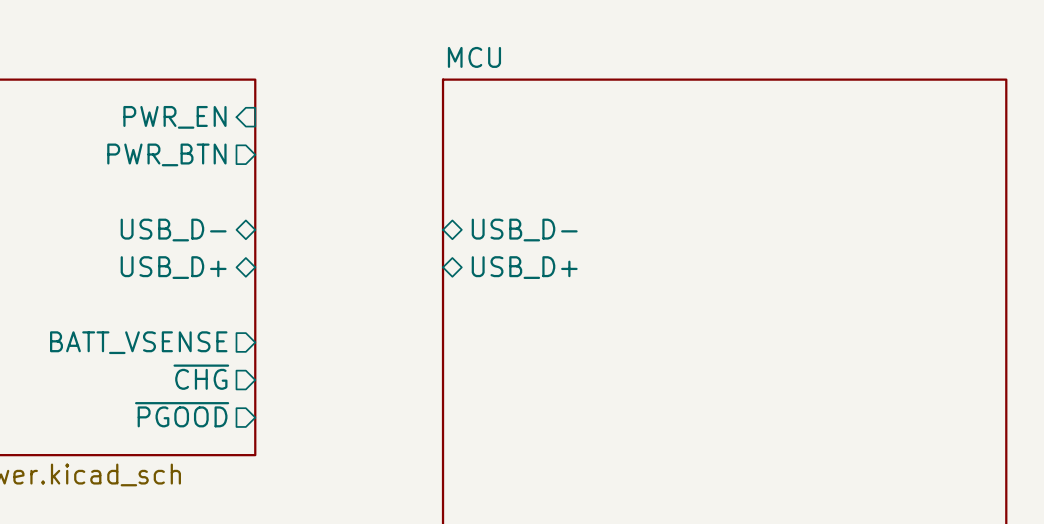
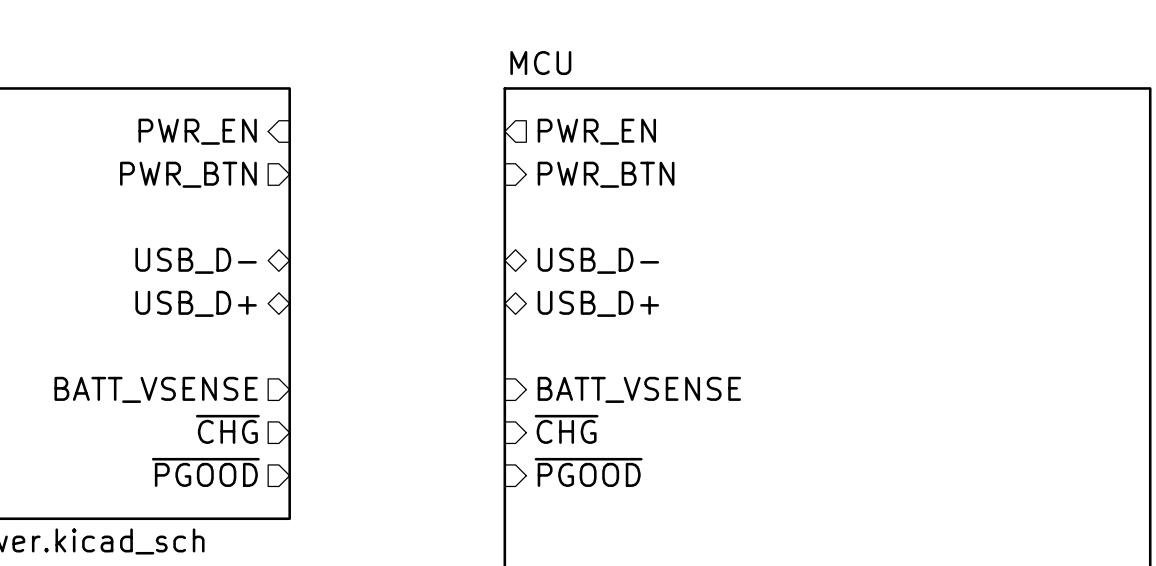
sheet pin: none -> PWR_EN (596, 131)
sheet pin: none -> PWR_BTN (606, 174)
sheet pin: none -> BATT_VSENSE (639, 389)
sheet pin: none -> ~{CHG} (566, 429)
sheet pin: none -> ~{PGOOD} (588, 472)

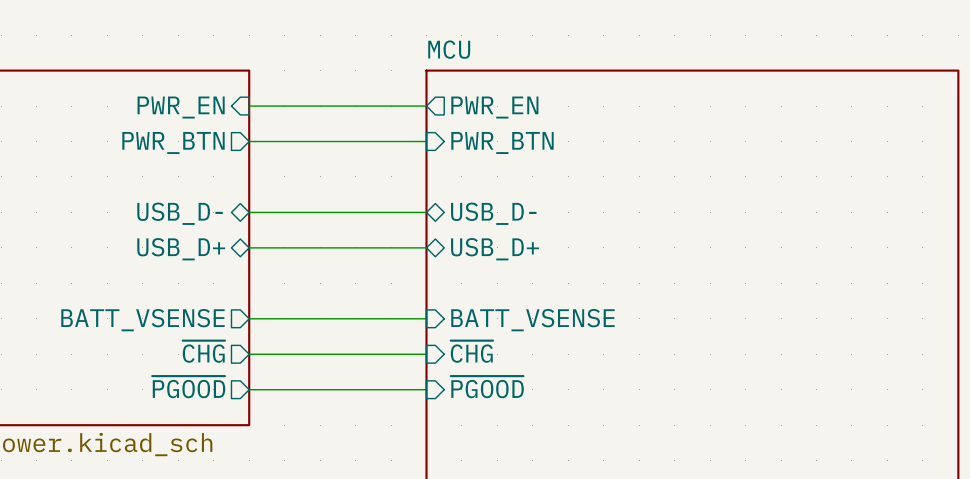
wire: none -> (249, 106) (426, 106)
wire: none -> (249, 141) (426, 141)
wire: none -> (249, 212) (426, 212)
wire: none -> (249, 247) (426, 247)
wire: none -> (249, 318) (426, 318)
wire: none -> (249, 354) (426, 354)
wire: none -> (249, 389) (426, 389)

